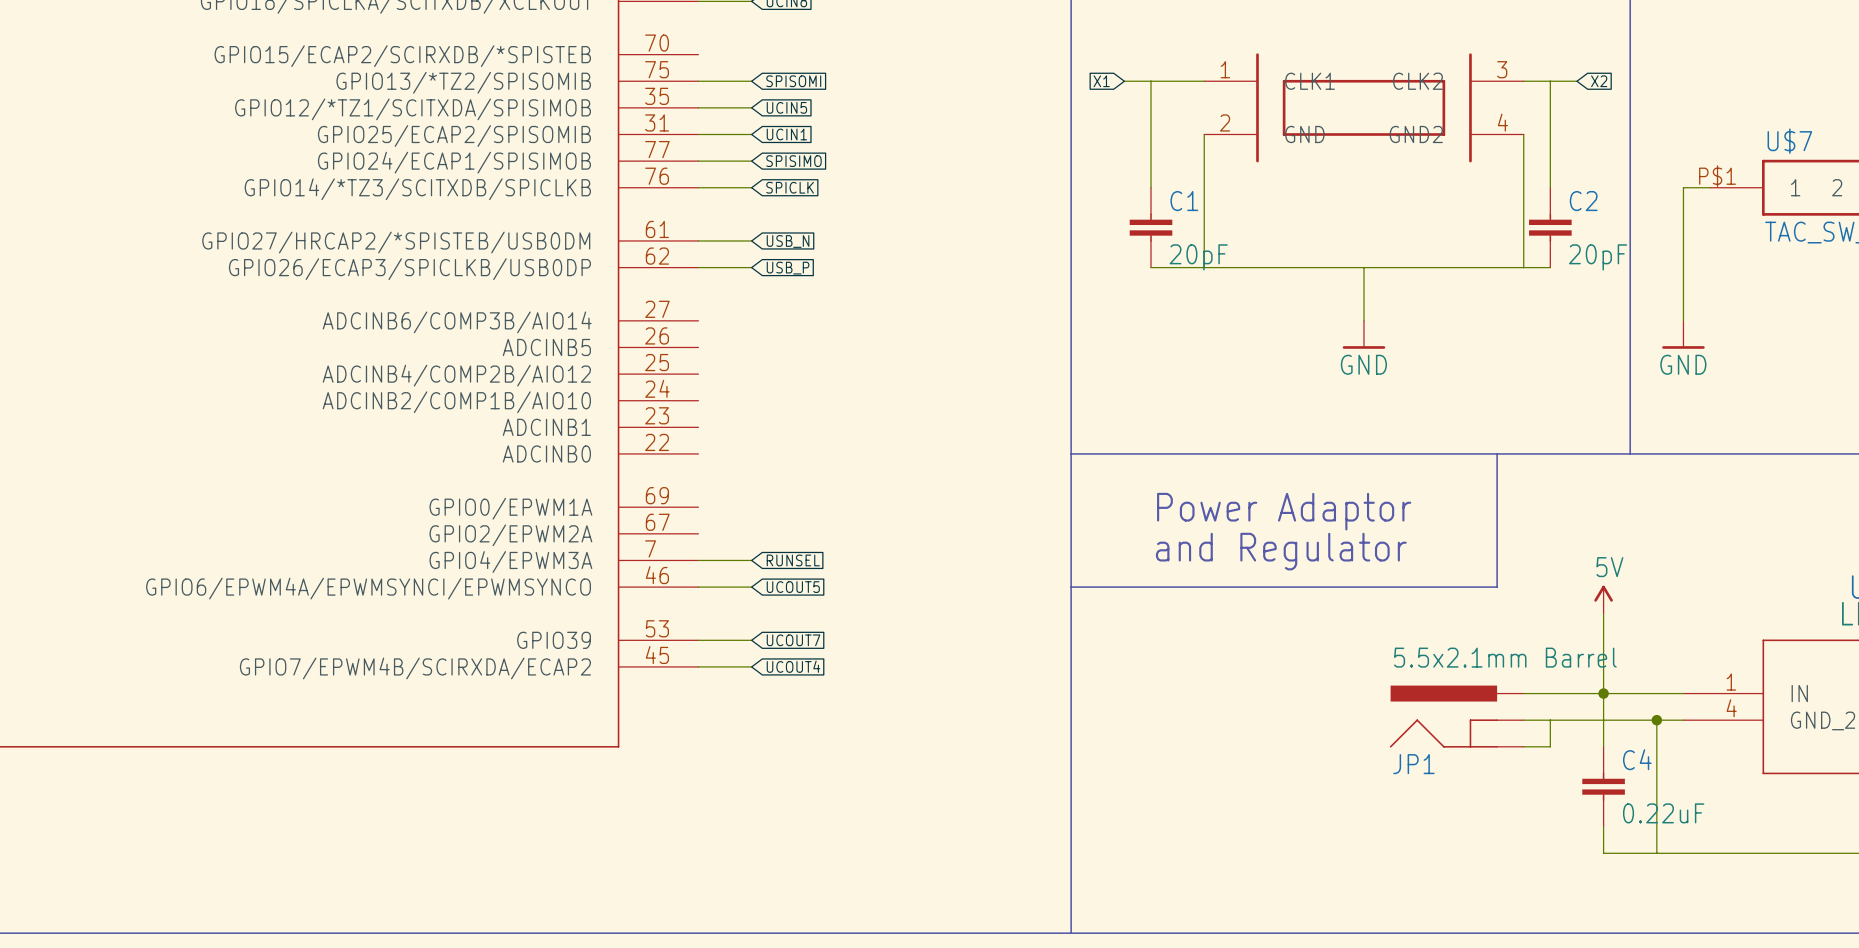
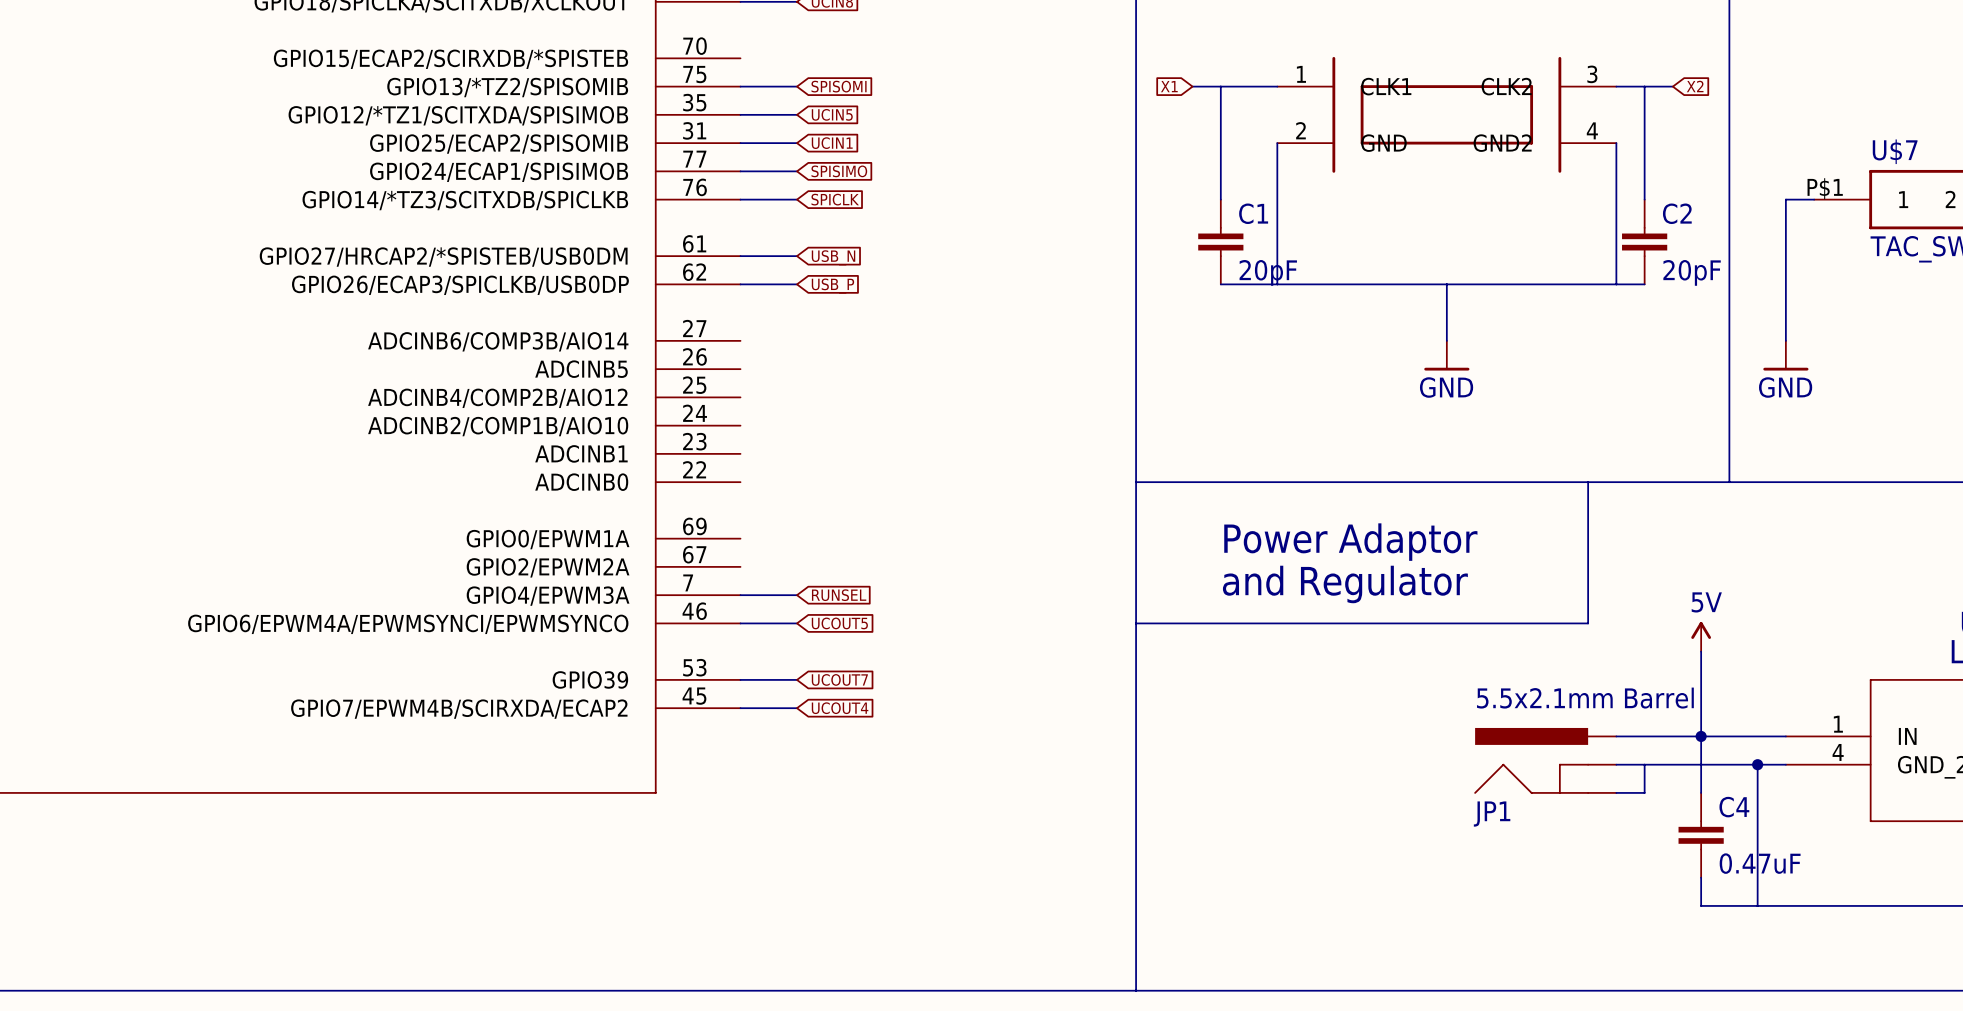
C4 value: 0.22uF (1663, 813) -> 0.47uF (1760, 863)

